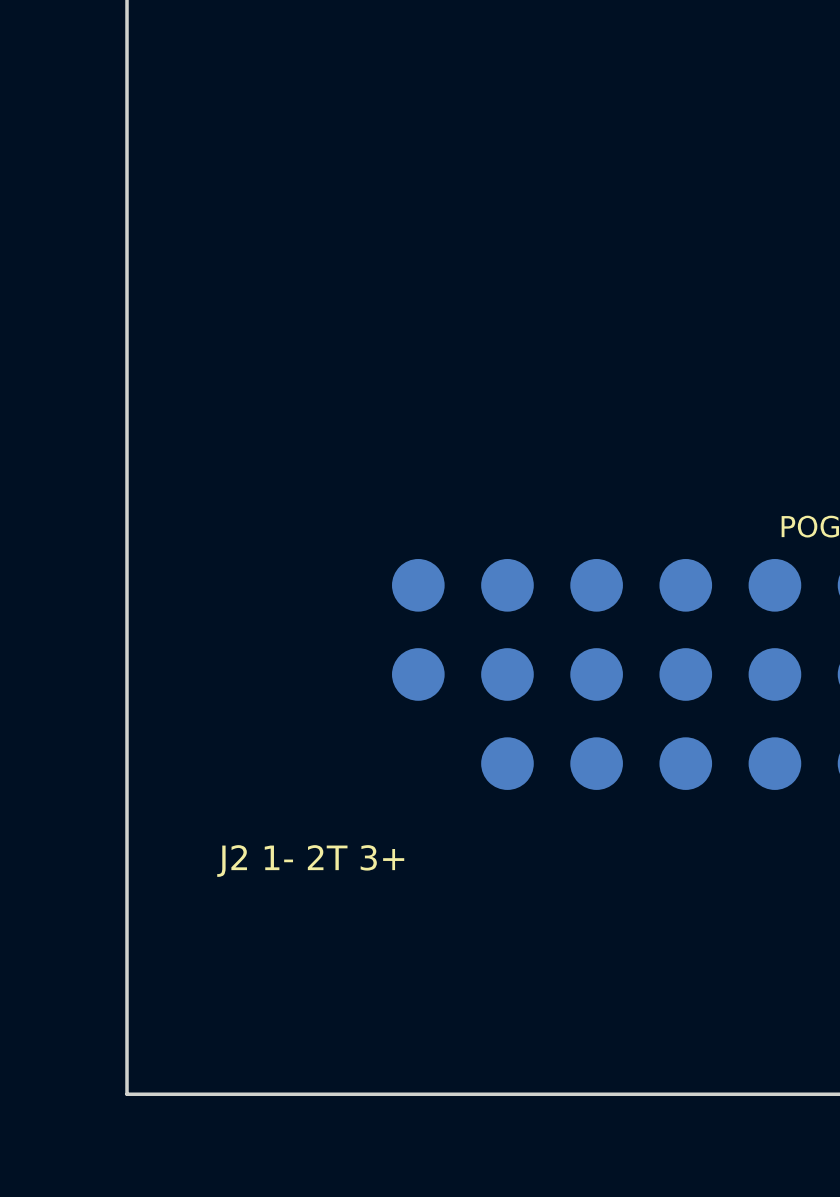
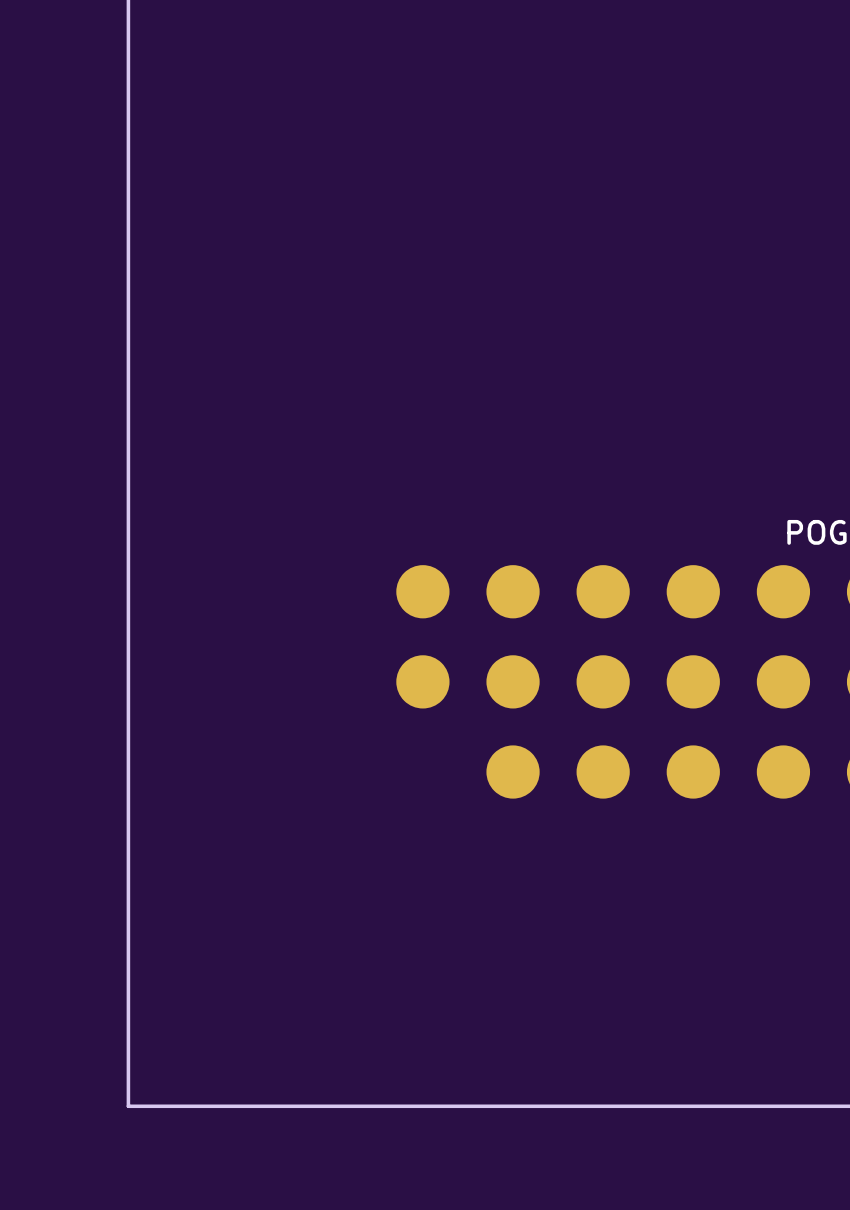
text: J2 1- 2T 3+ (310, 860) -> none

